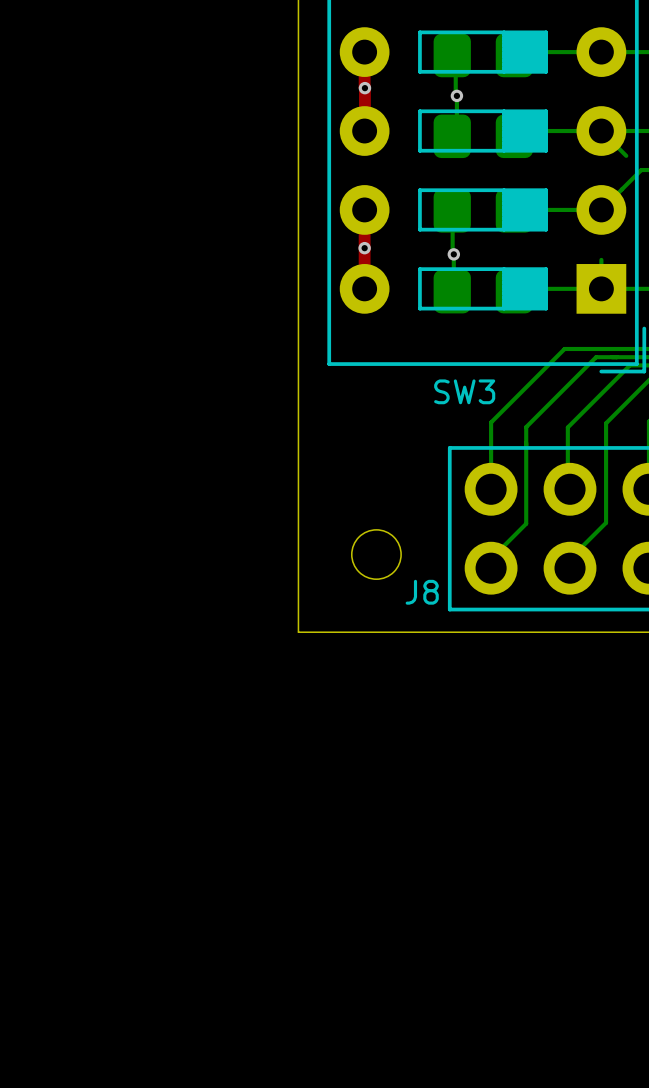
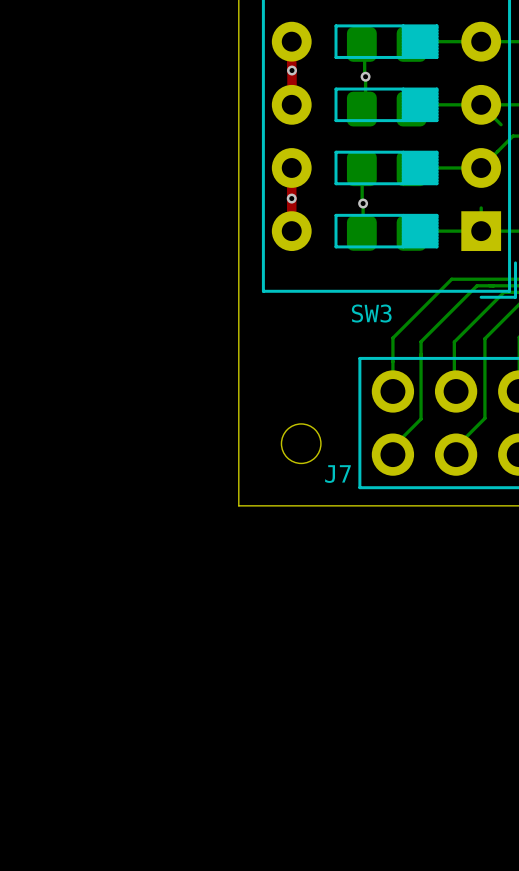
J8 name: J8 (422, 592) -> J7 (337, 474)

